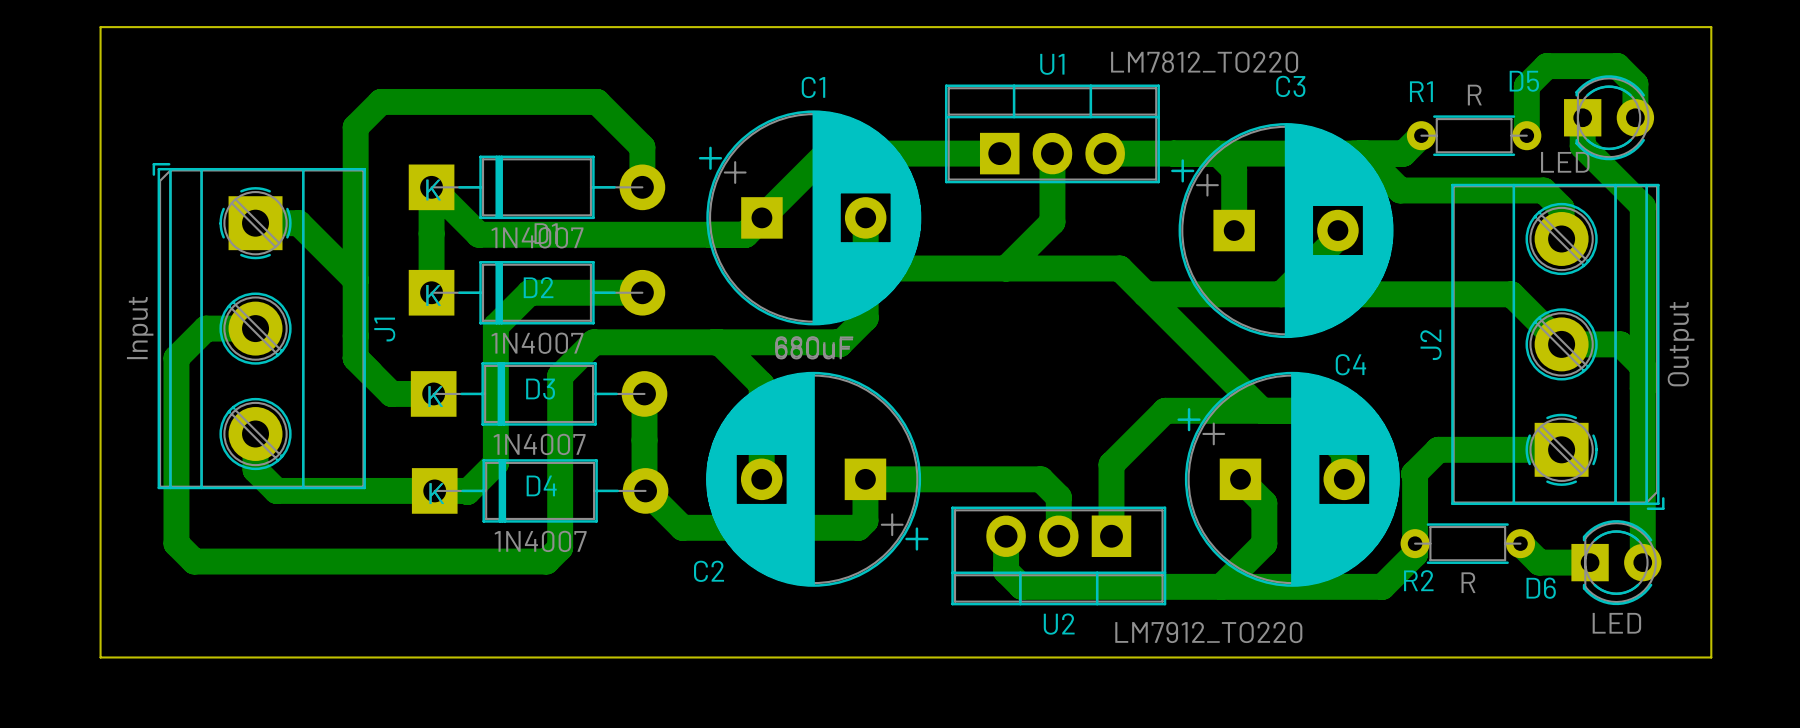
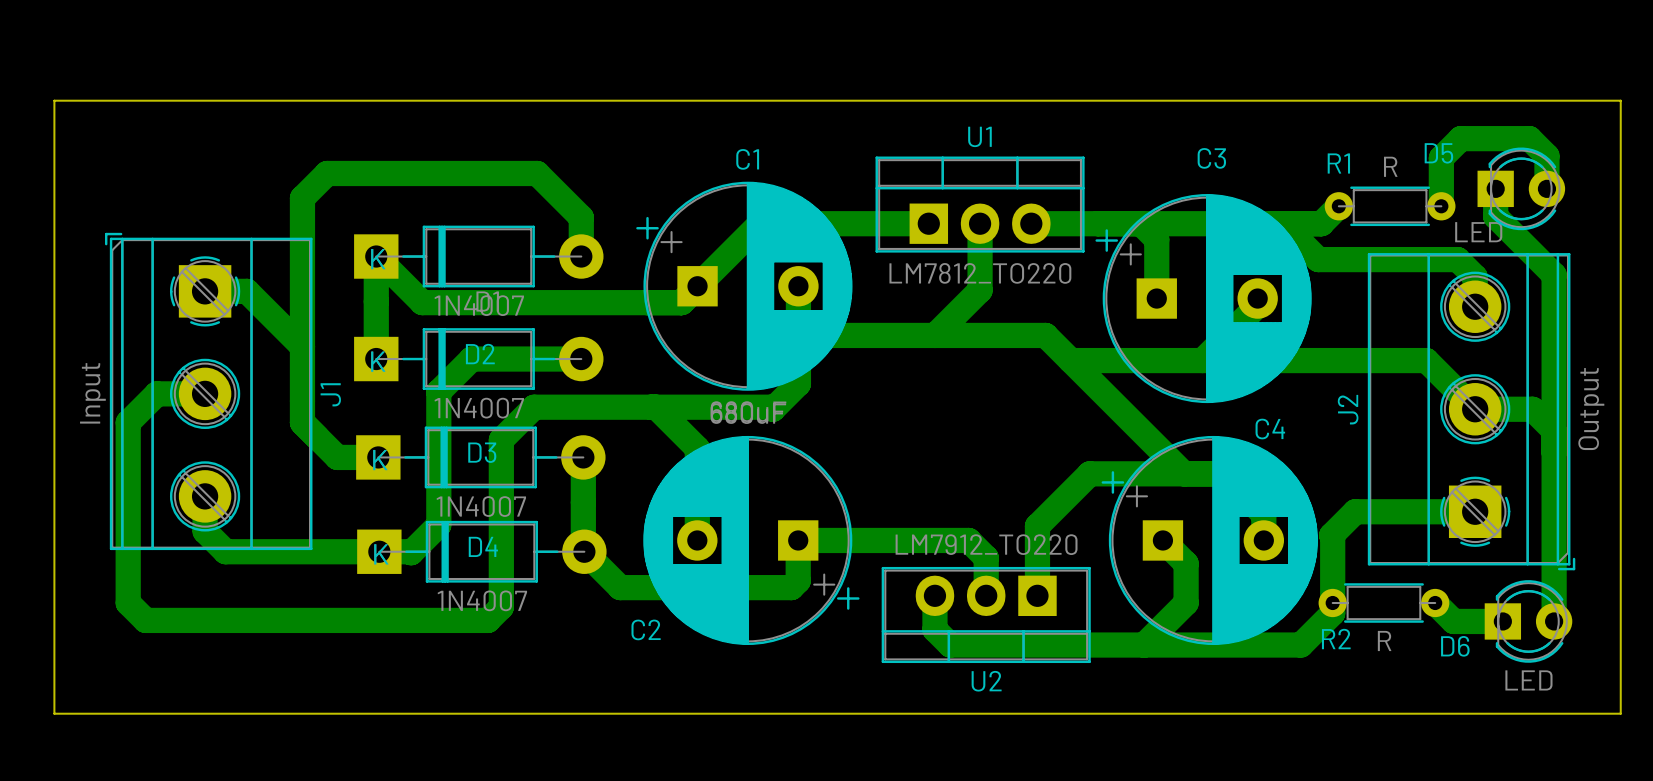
U1 value position: LM7812_TO220 (1204, 62) -> LM7812_TO220 (980, 273)
U2 value position: LM7912_TO220 (1208, 632) -> LM7912_TO220 (986, 544)

